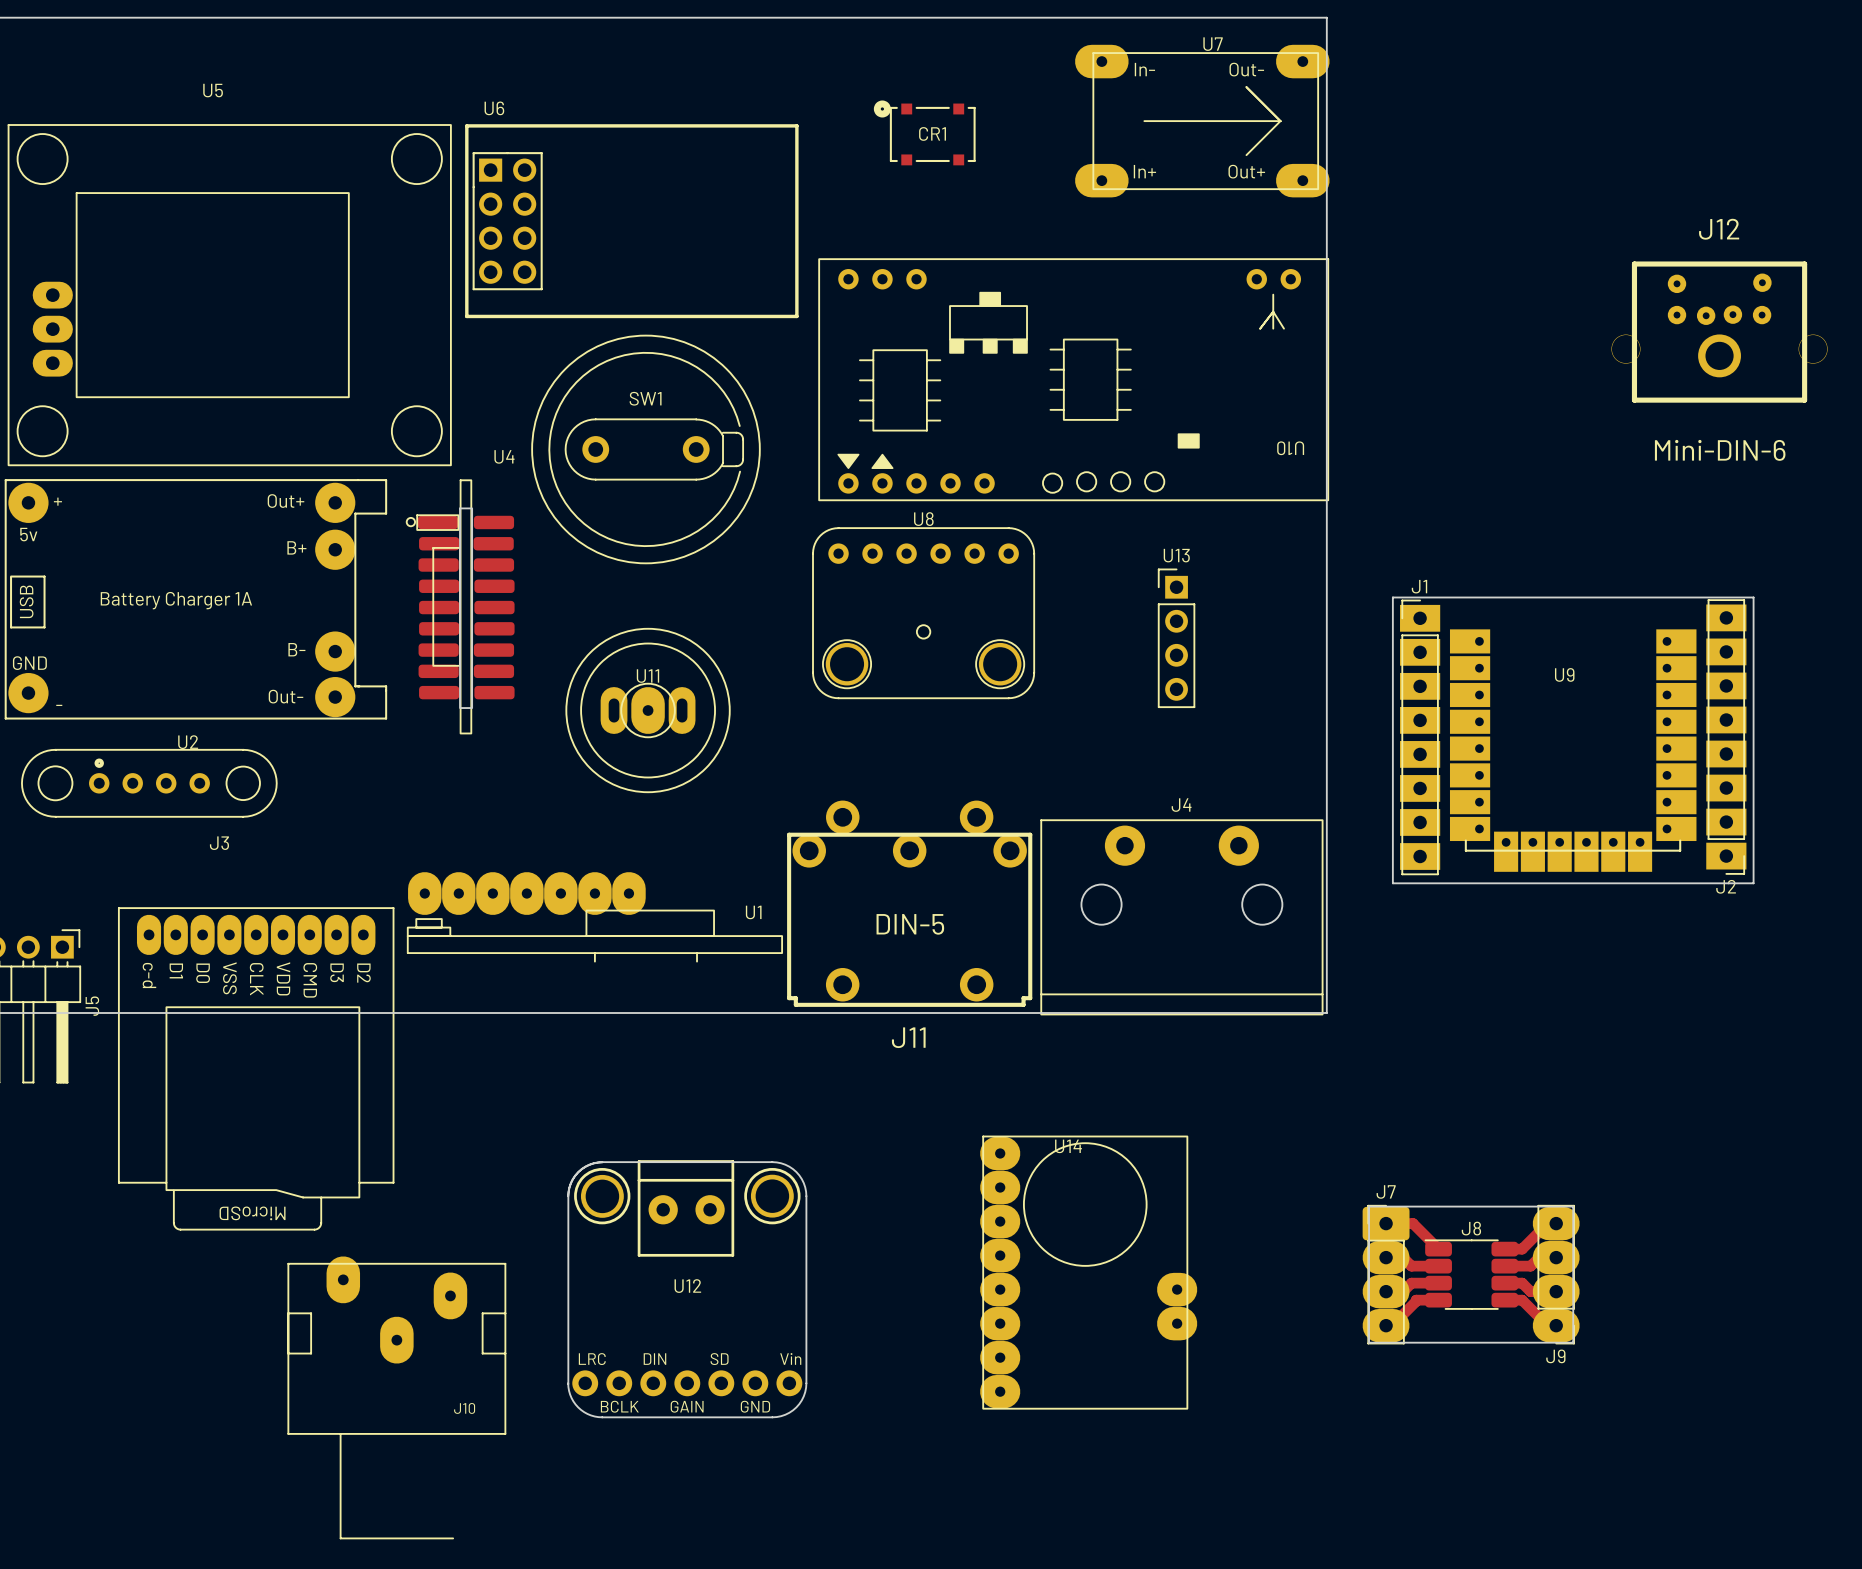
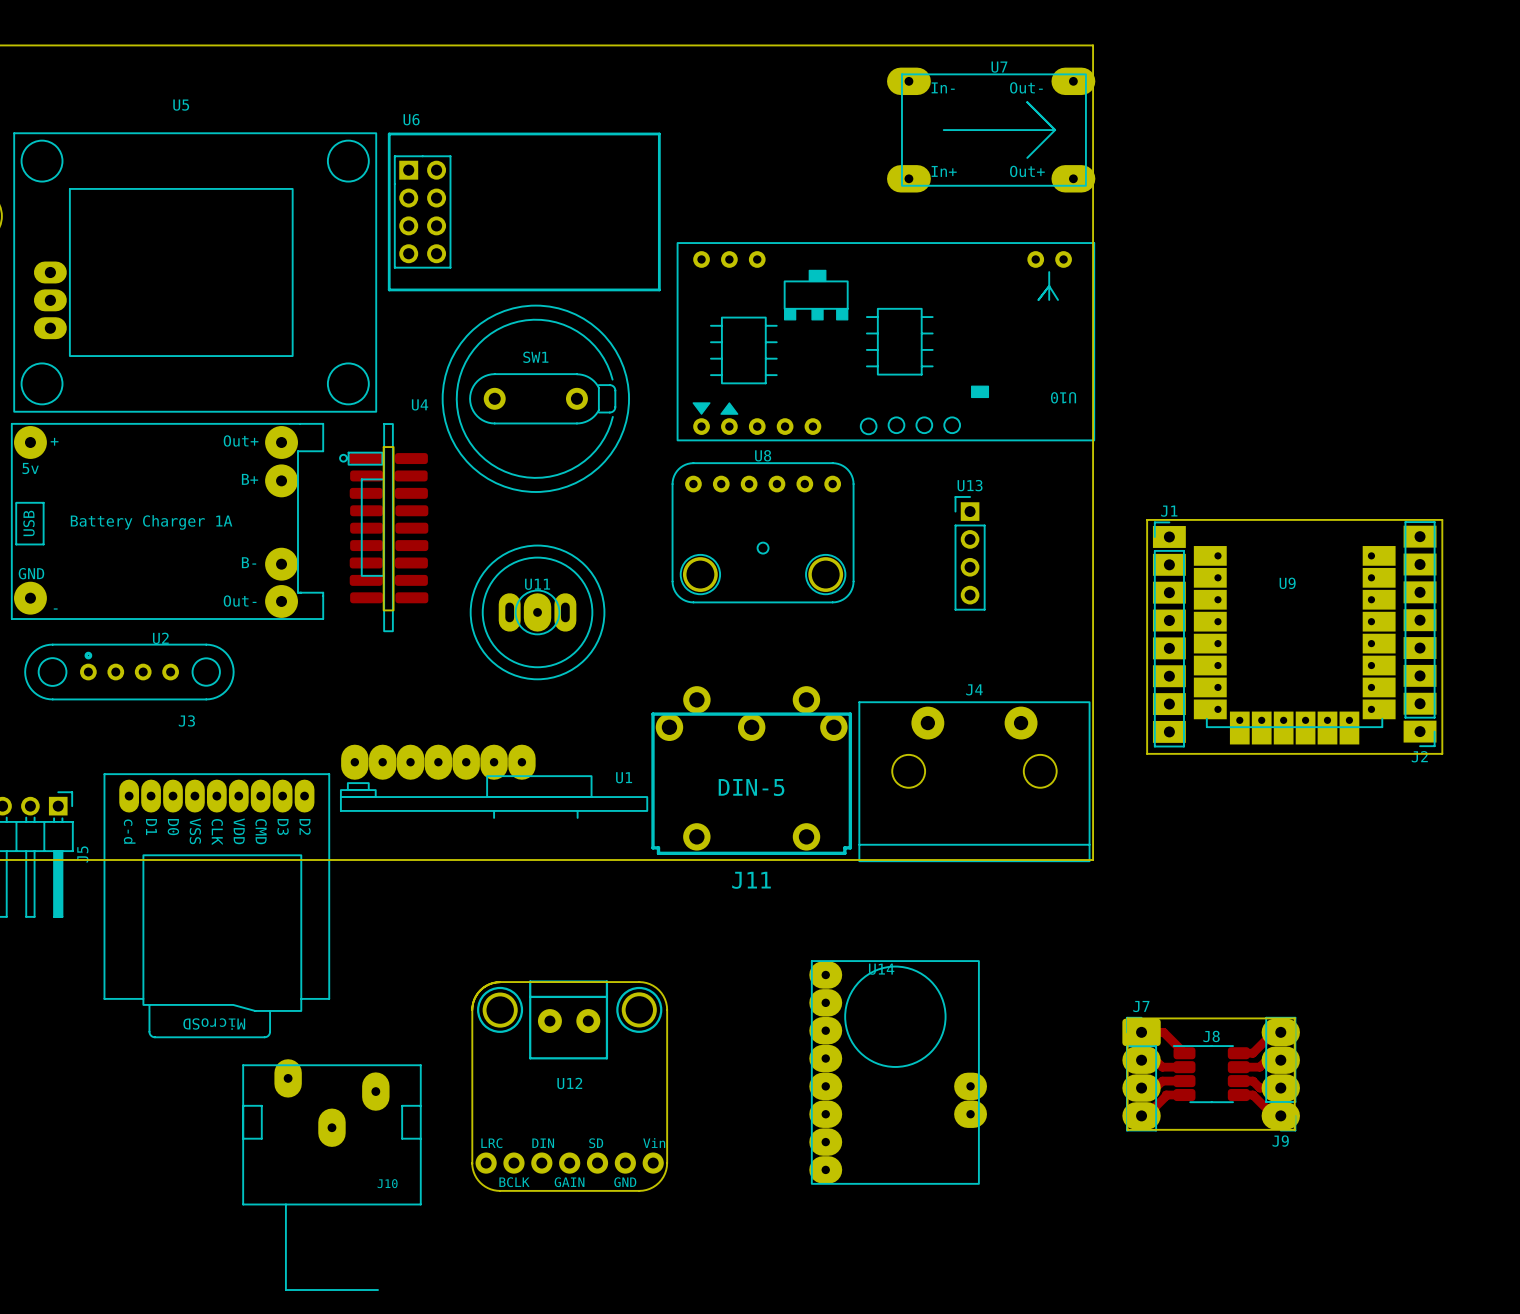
CR1: (924, 132) -> none
J12: Mini-DIN-6 (1719, 332) -> none

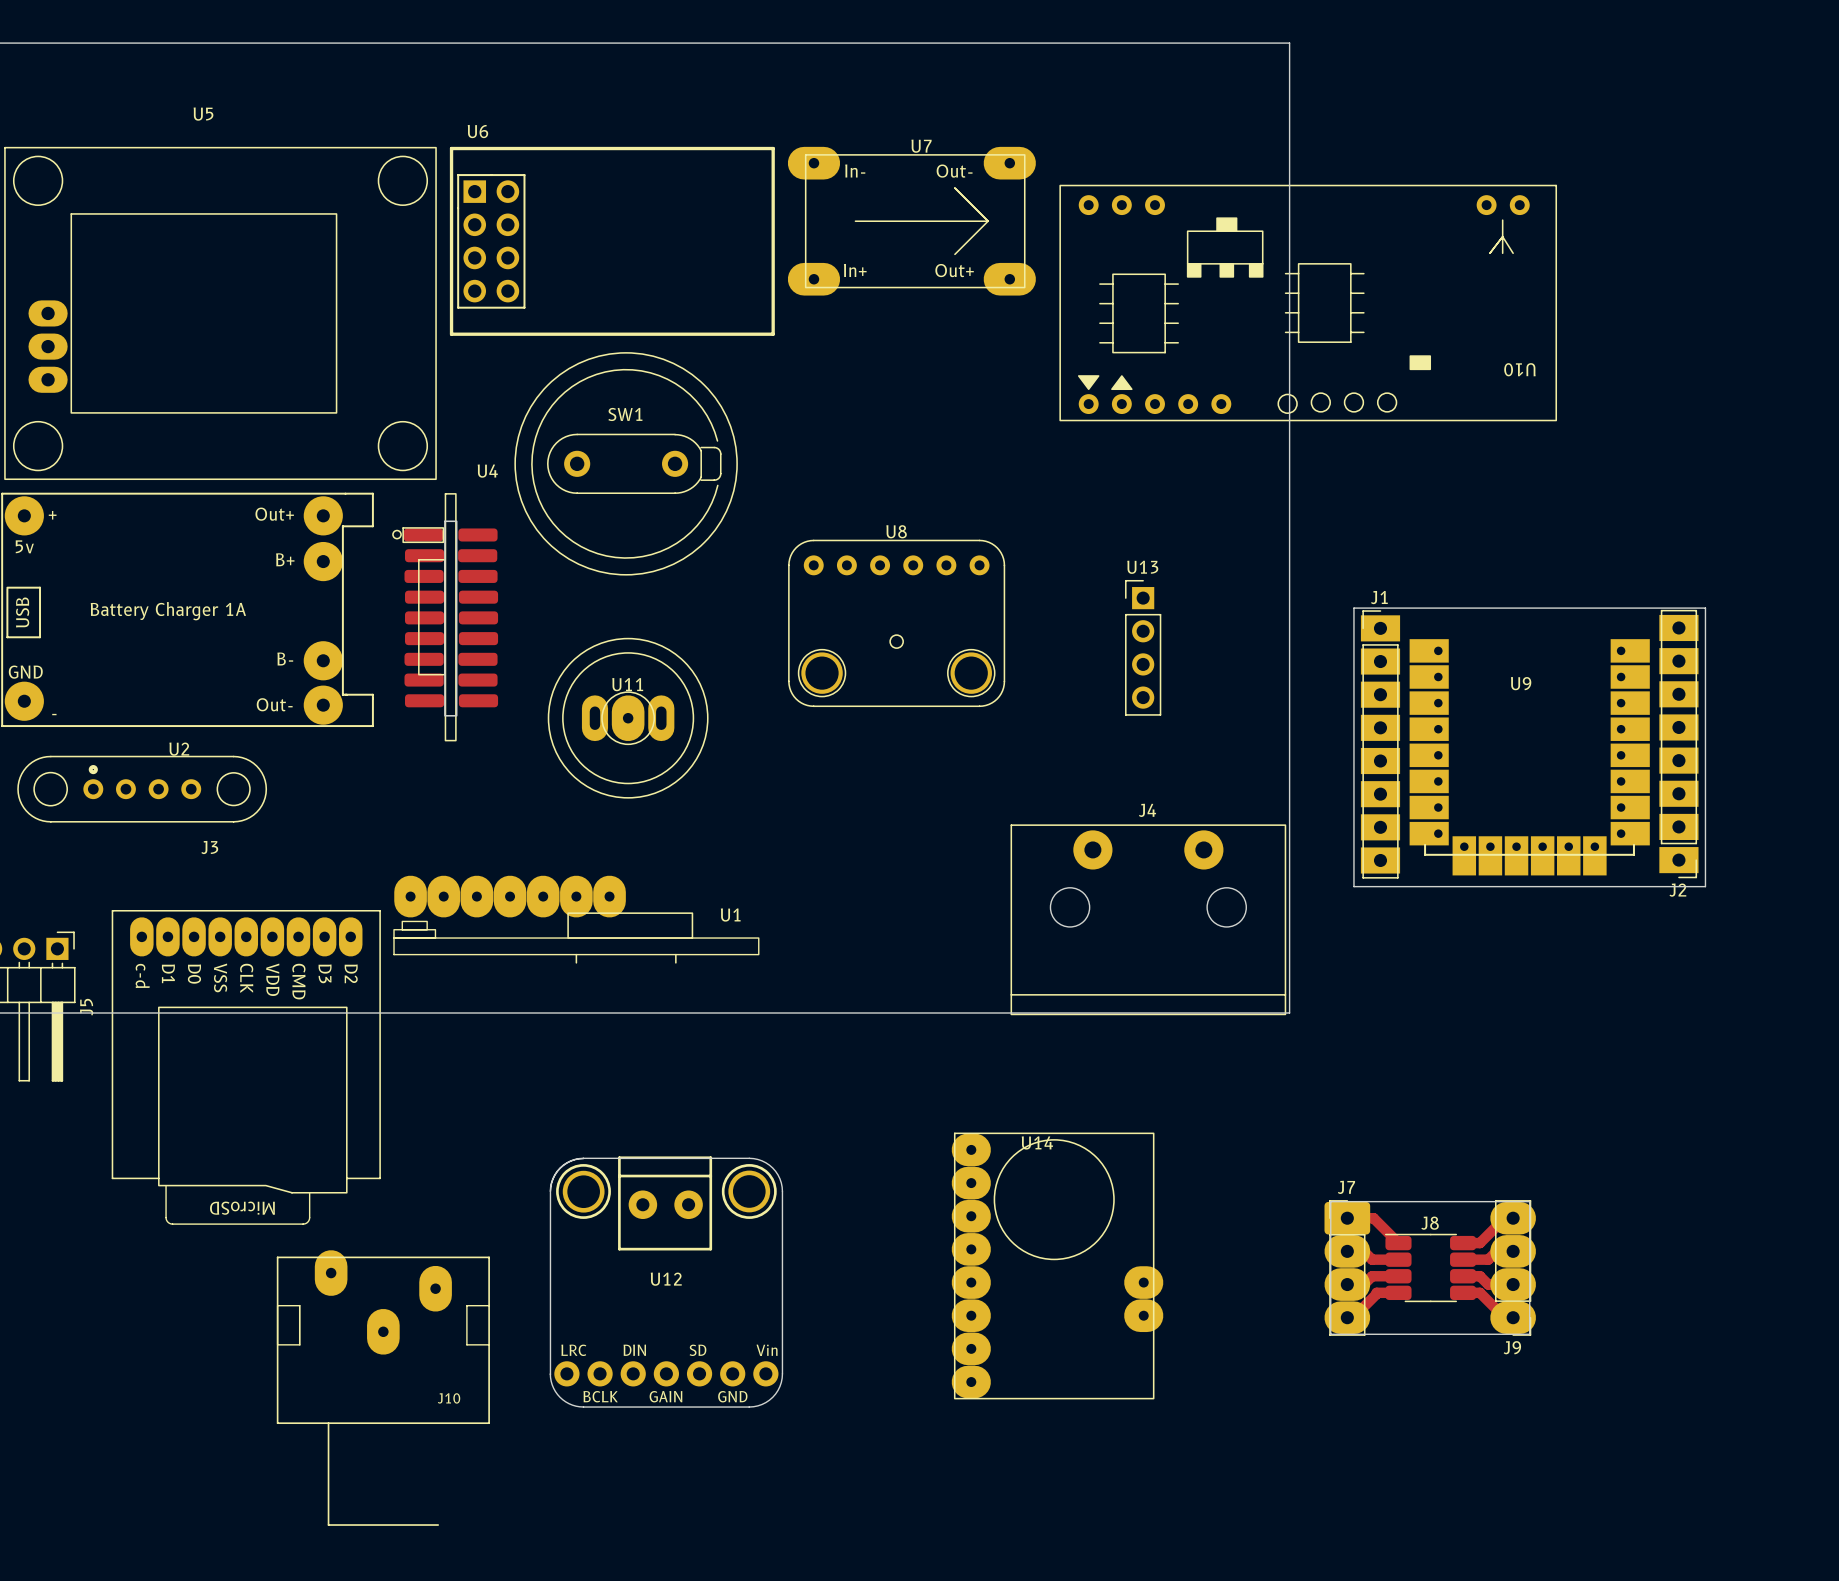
U7 position: (991, 130) -> (911, 221)
U10 position: (885, 341) -> (1308, 303)
J11: DIN-5 (751, 770) -> none

